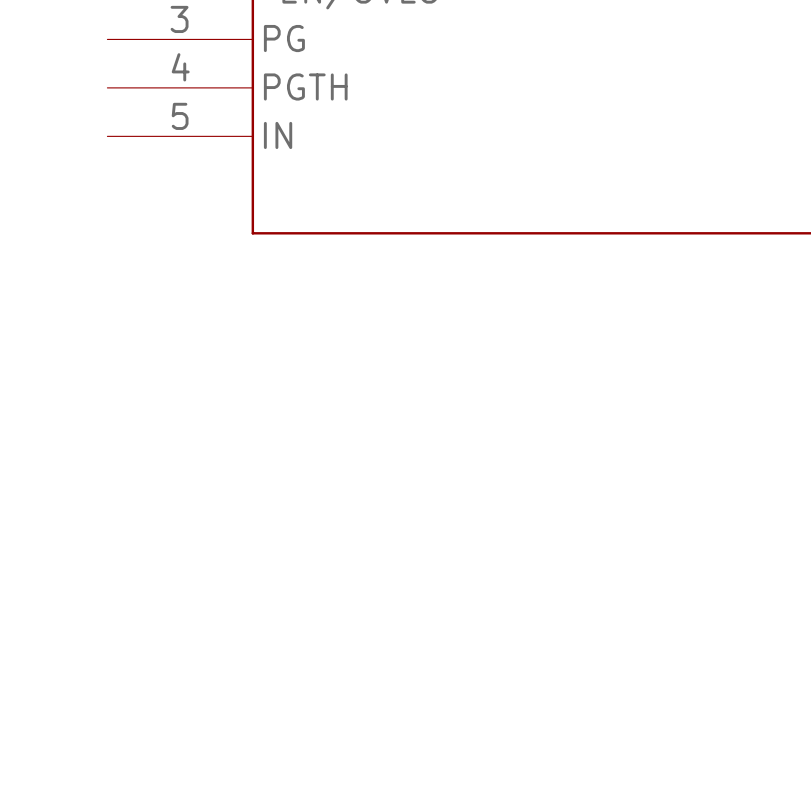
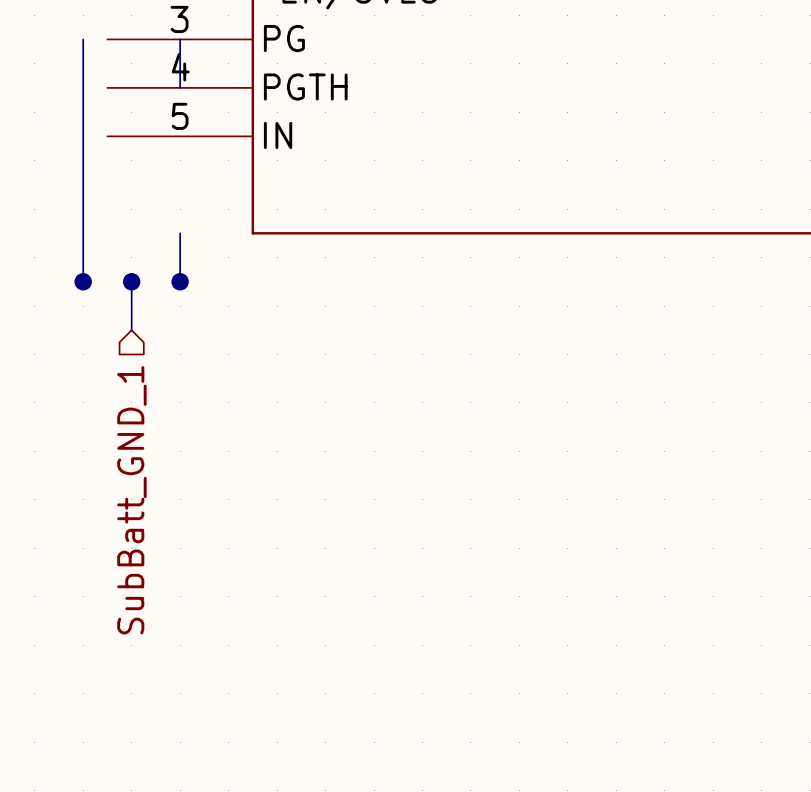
wire: none -> (83, 39) (83, 281)
wire: none -> (180, 39) (180, 87)
wire: none -> (180, 233) (180, 281)
junction: none -> (83, 281)
wire: none -> (131, 281) (131, 330)
junction: none -> (131, 281)
junction: none -> (180, 281)
hierarchical label: none -> SubBatt_GND_1 (131, 500)

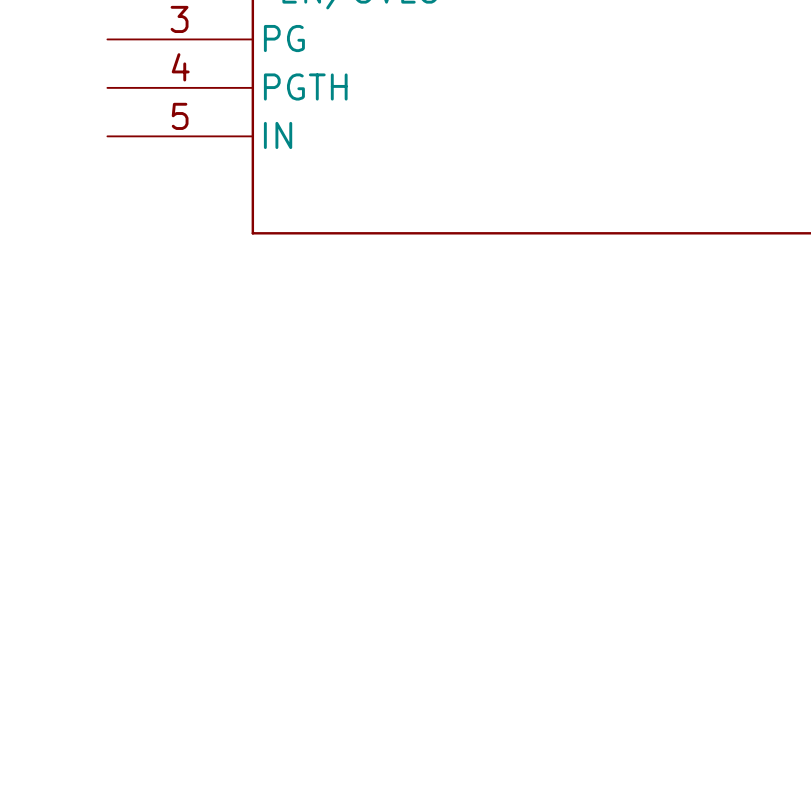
wire: (83, 39) (83, 281) -> none
wire: (180, 39) (180, 87) -> none
wire: (180, 233) (180, 281) -> none
junction: (83, 281) -> none
wire: (131, 281) (131, 330) -> none
junction: (131, 281) -> none
junction: (180, 281) -> none
hierarchical label: SubBatt_GND_1 (131, 500) -> none

